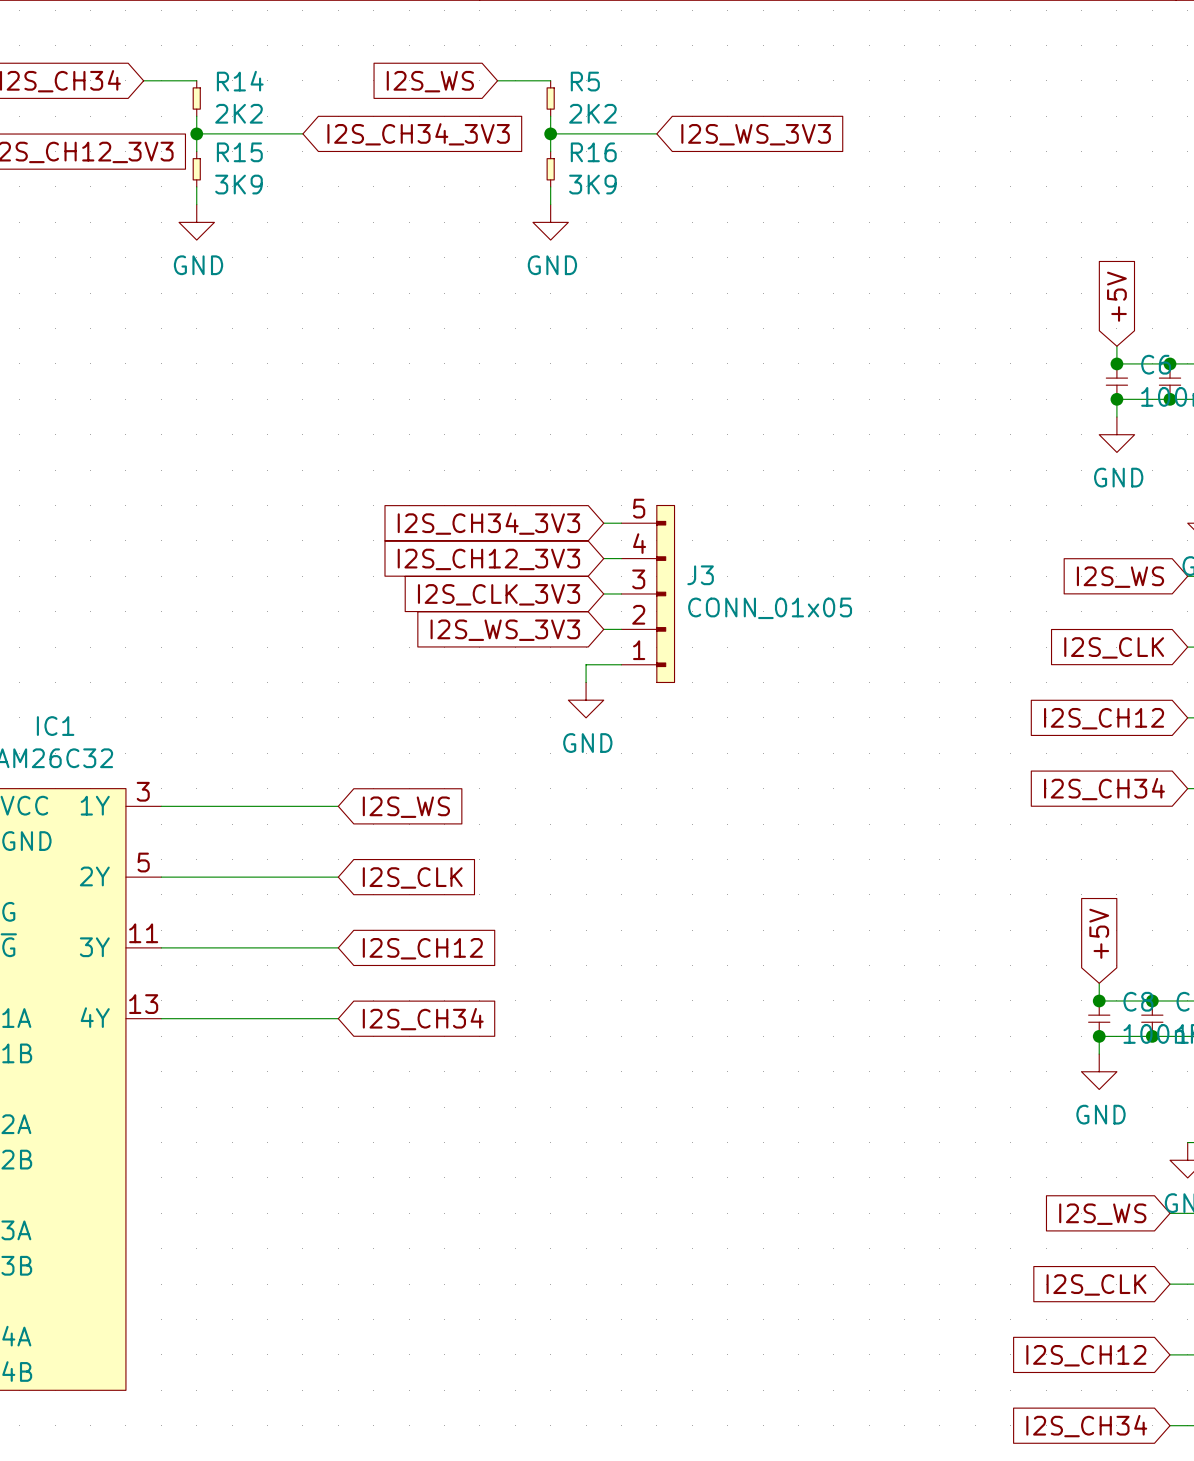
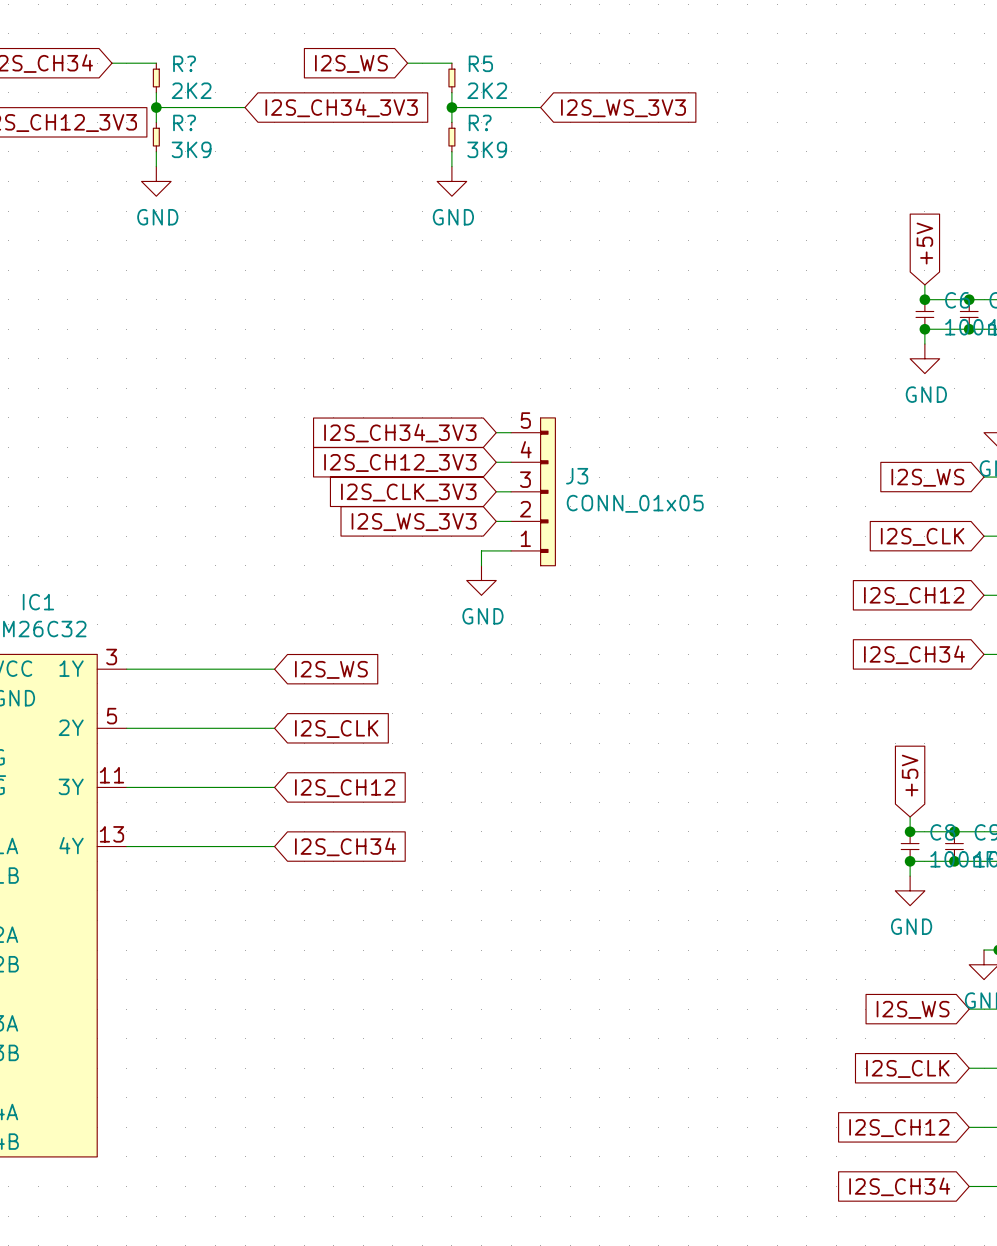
R14 name: R14 (240, 81) -> R? (184, 63)
R15 name: R15 (239, 152) -> R? (184, 122)
R16 name: R16 (593, 152) -> R? (480, 122)

